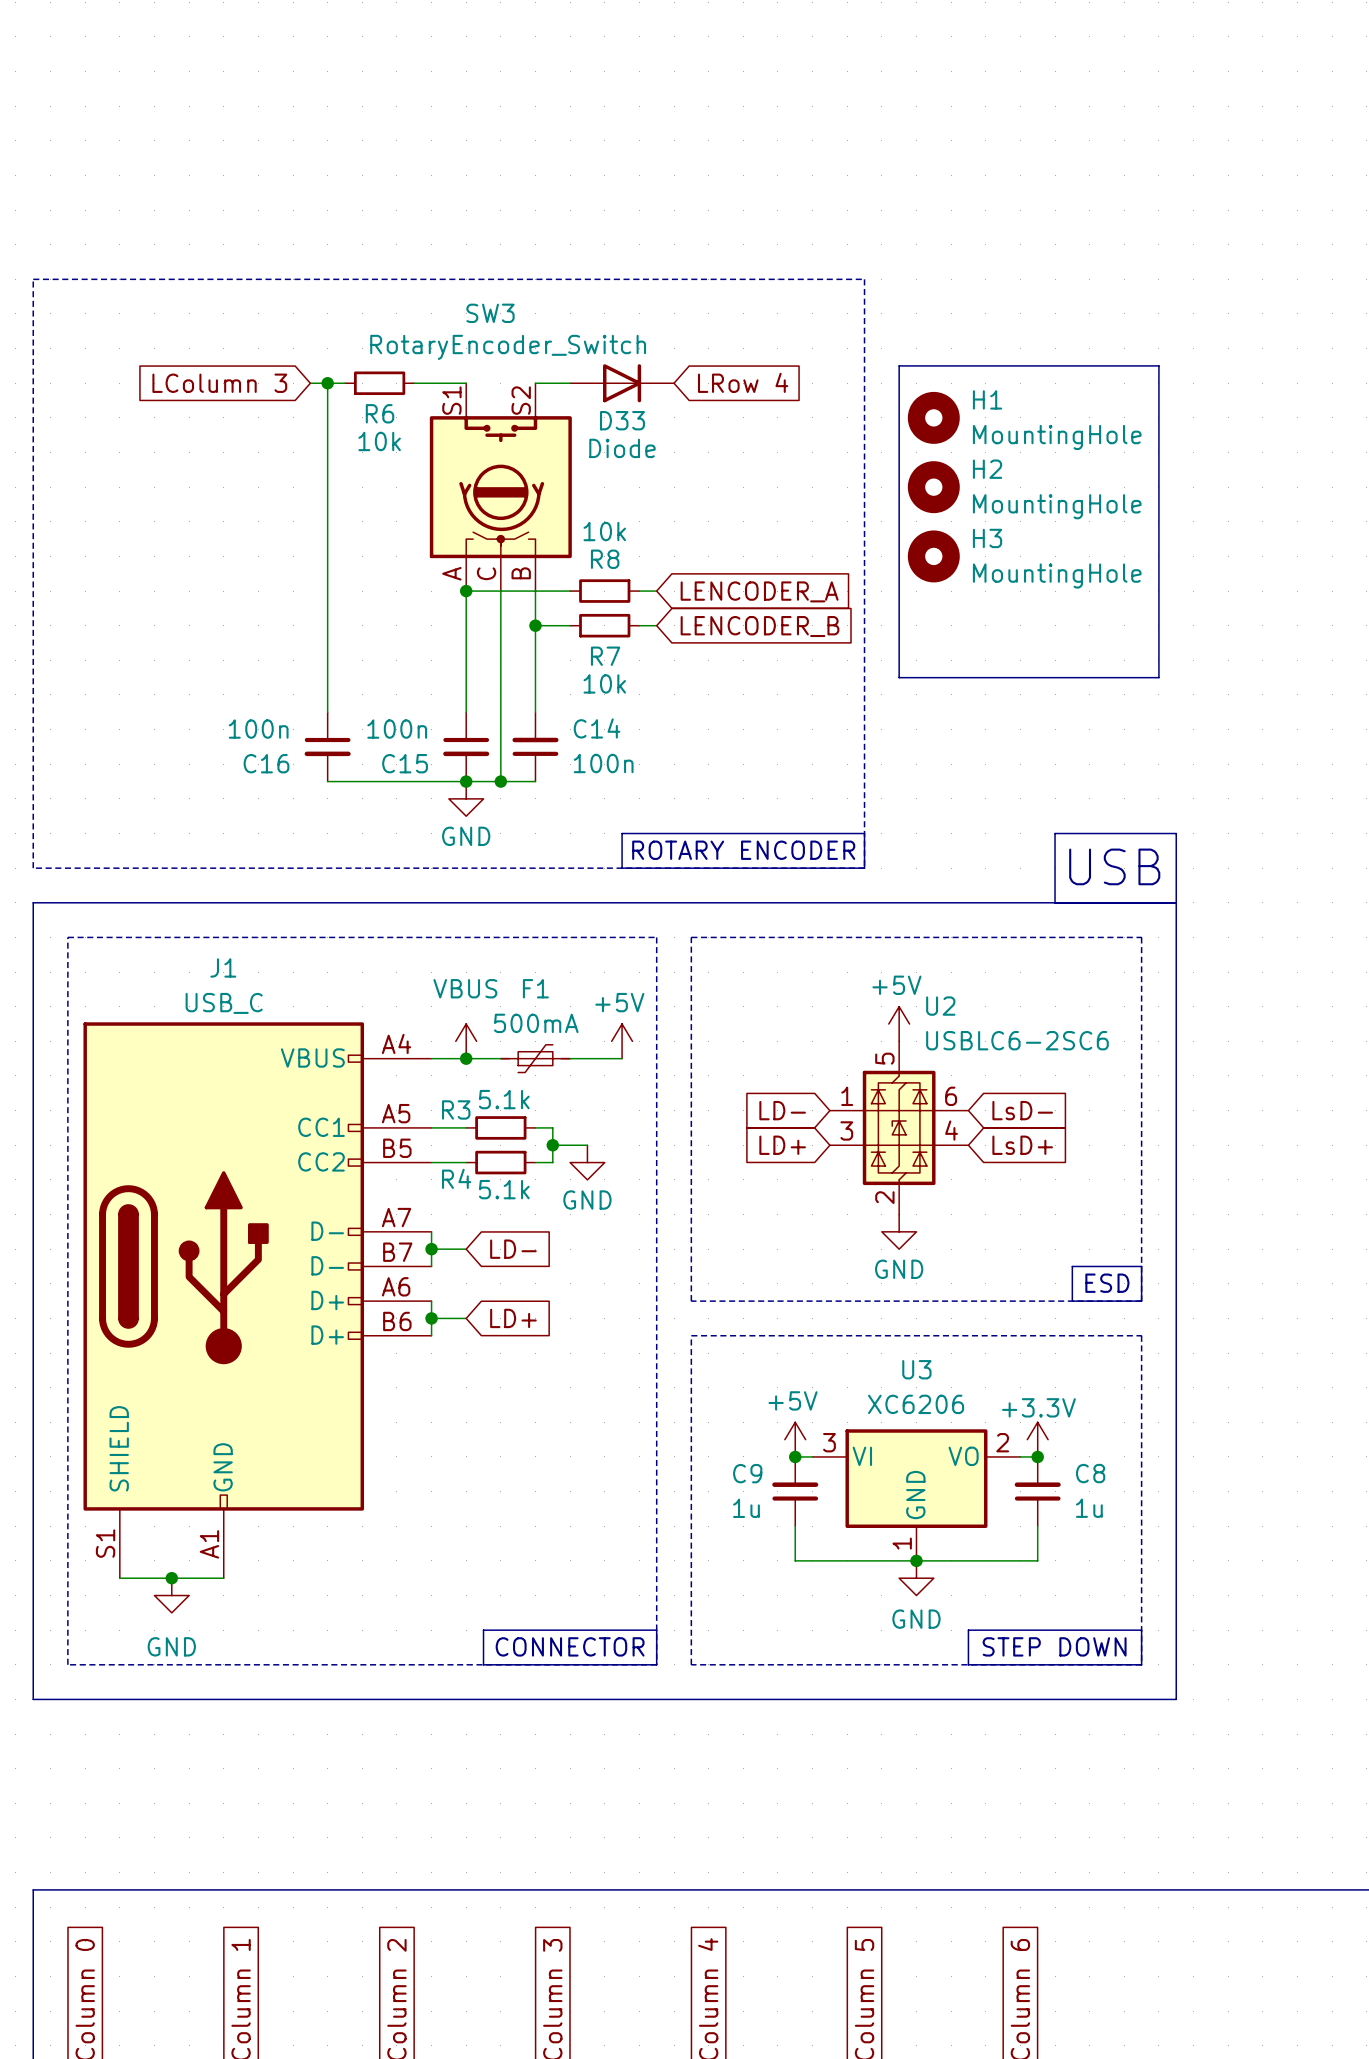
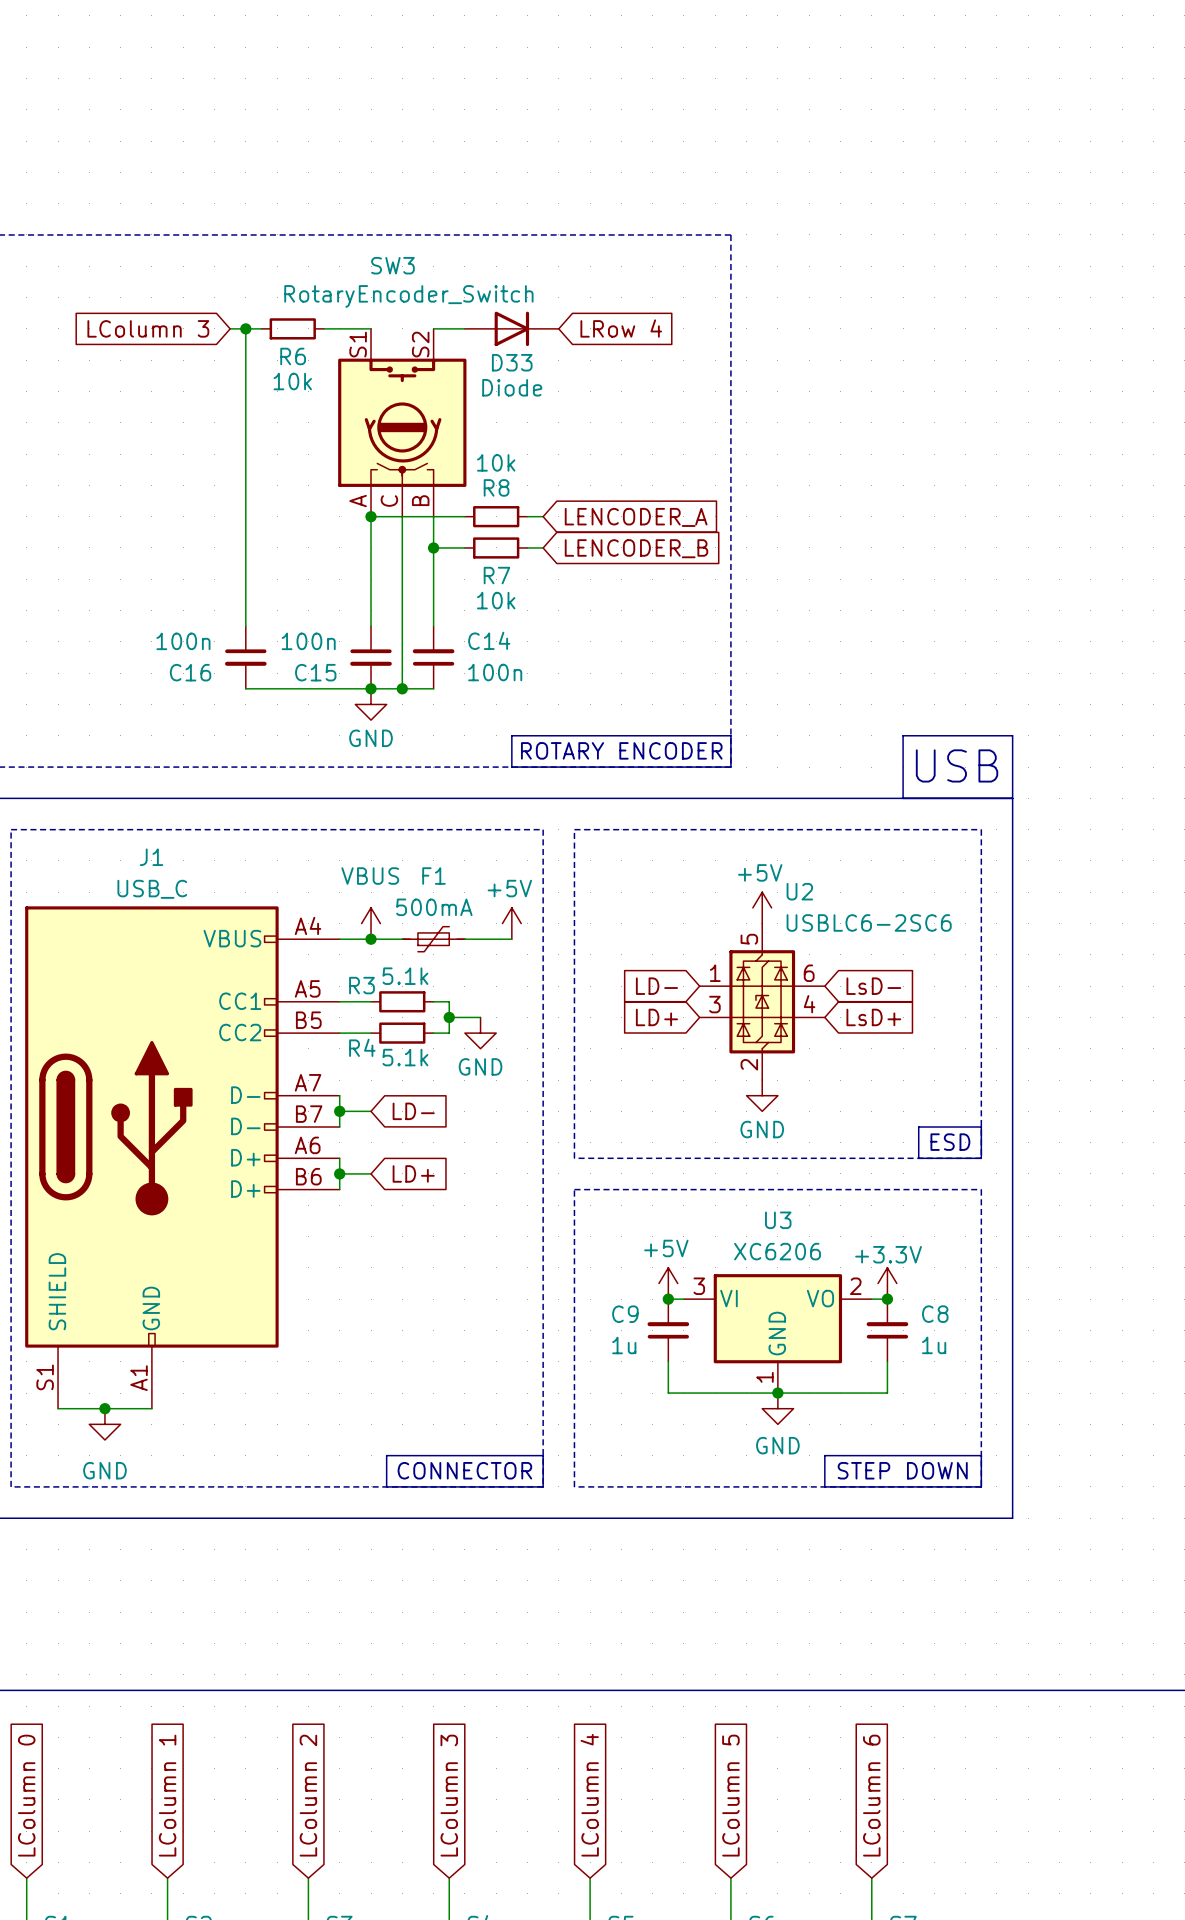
line: (899, 365) (1158, 365) (1158, 677) (899, 677) (899, 365) -> none
H1: MountingHole (933, 417) -> none
H2: MountingHole (933, 487) -> none
H3: MountingHole (933, 556) -> none

